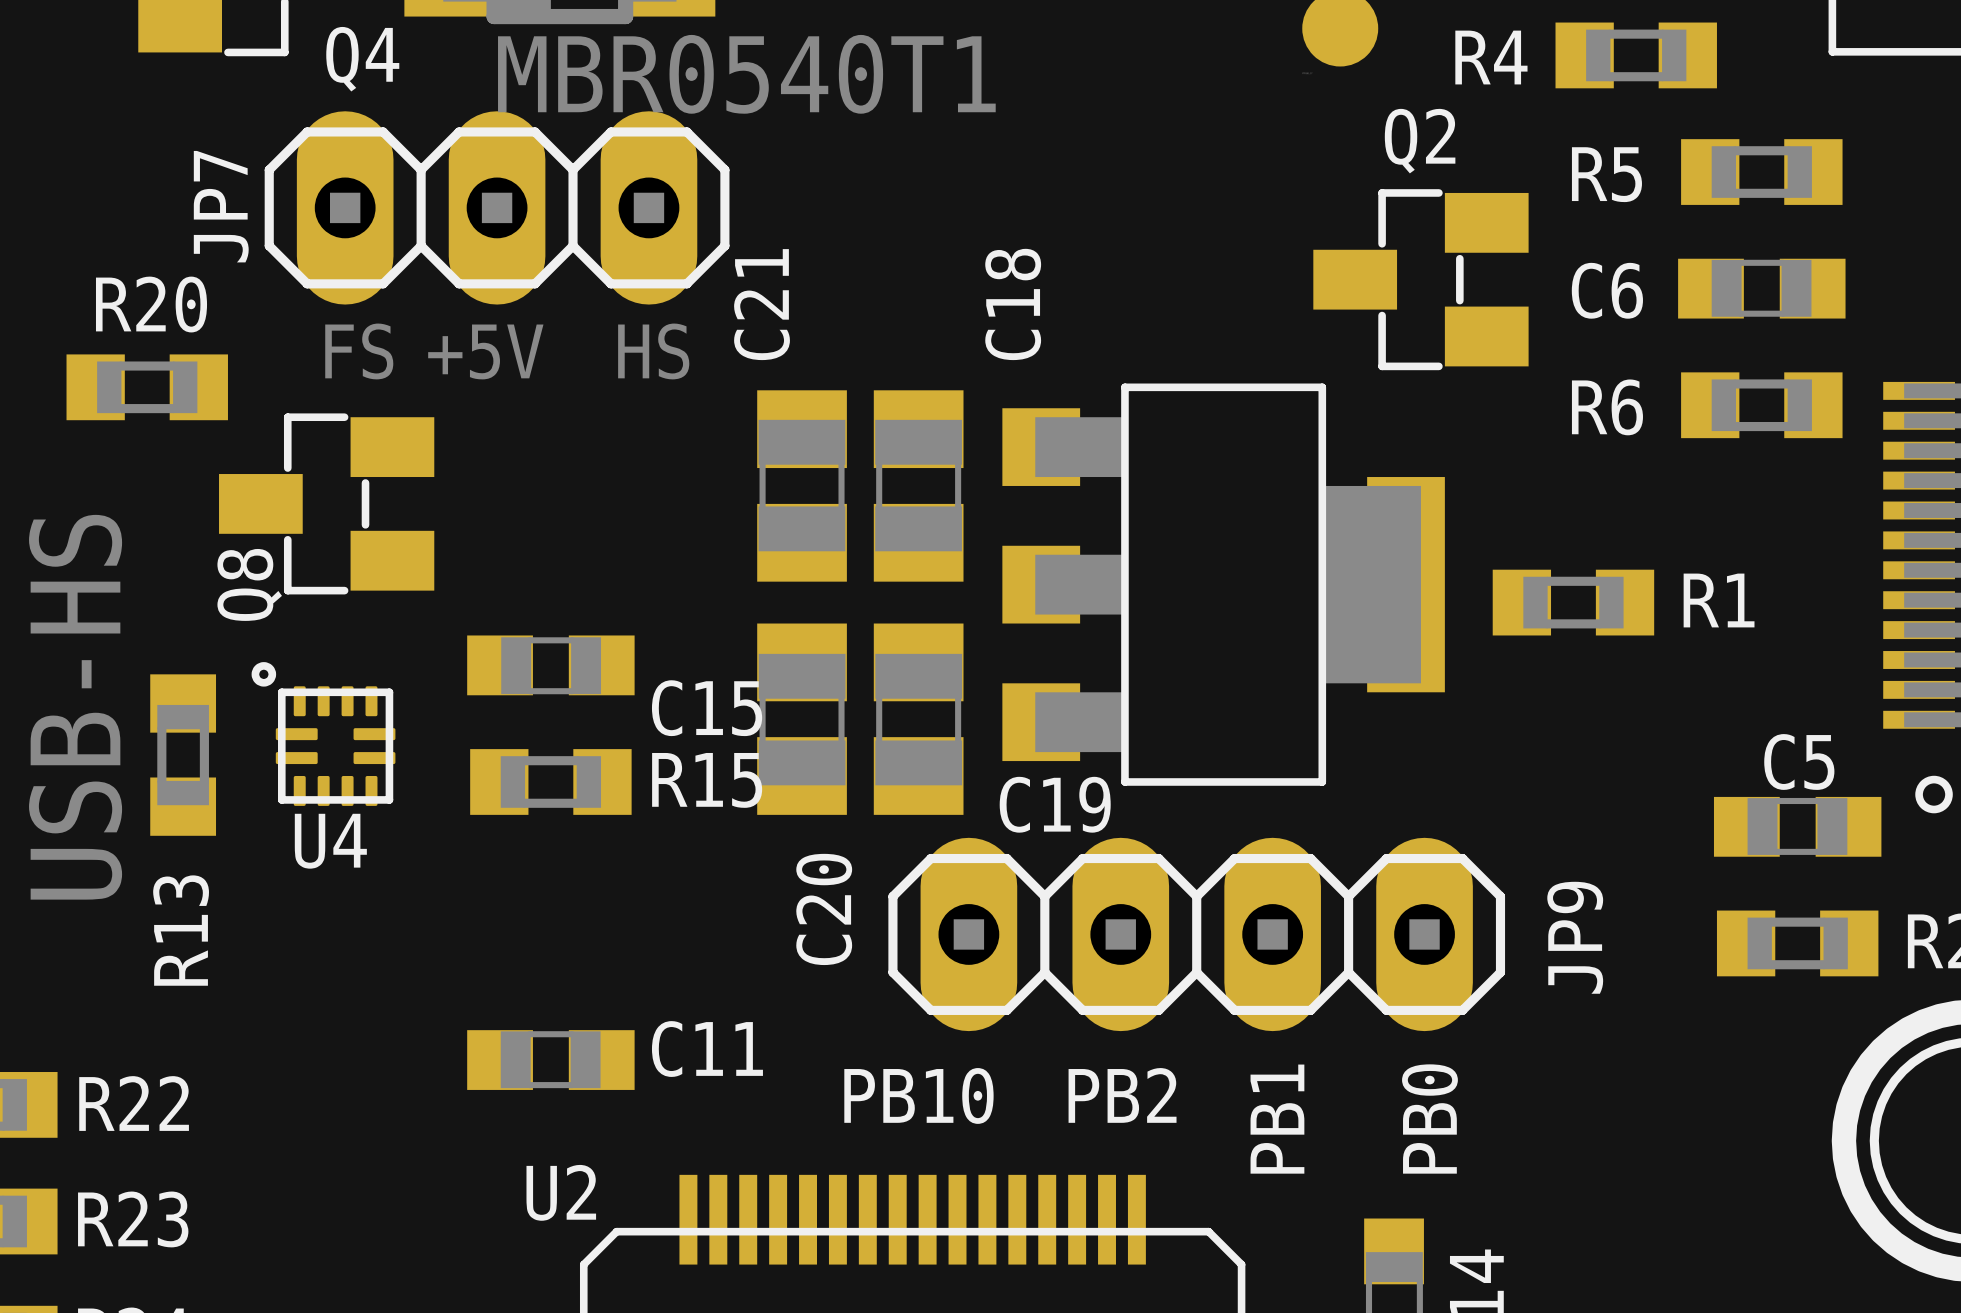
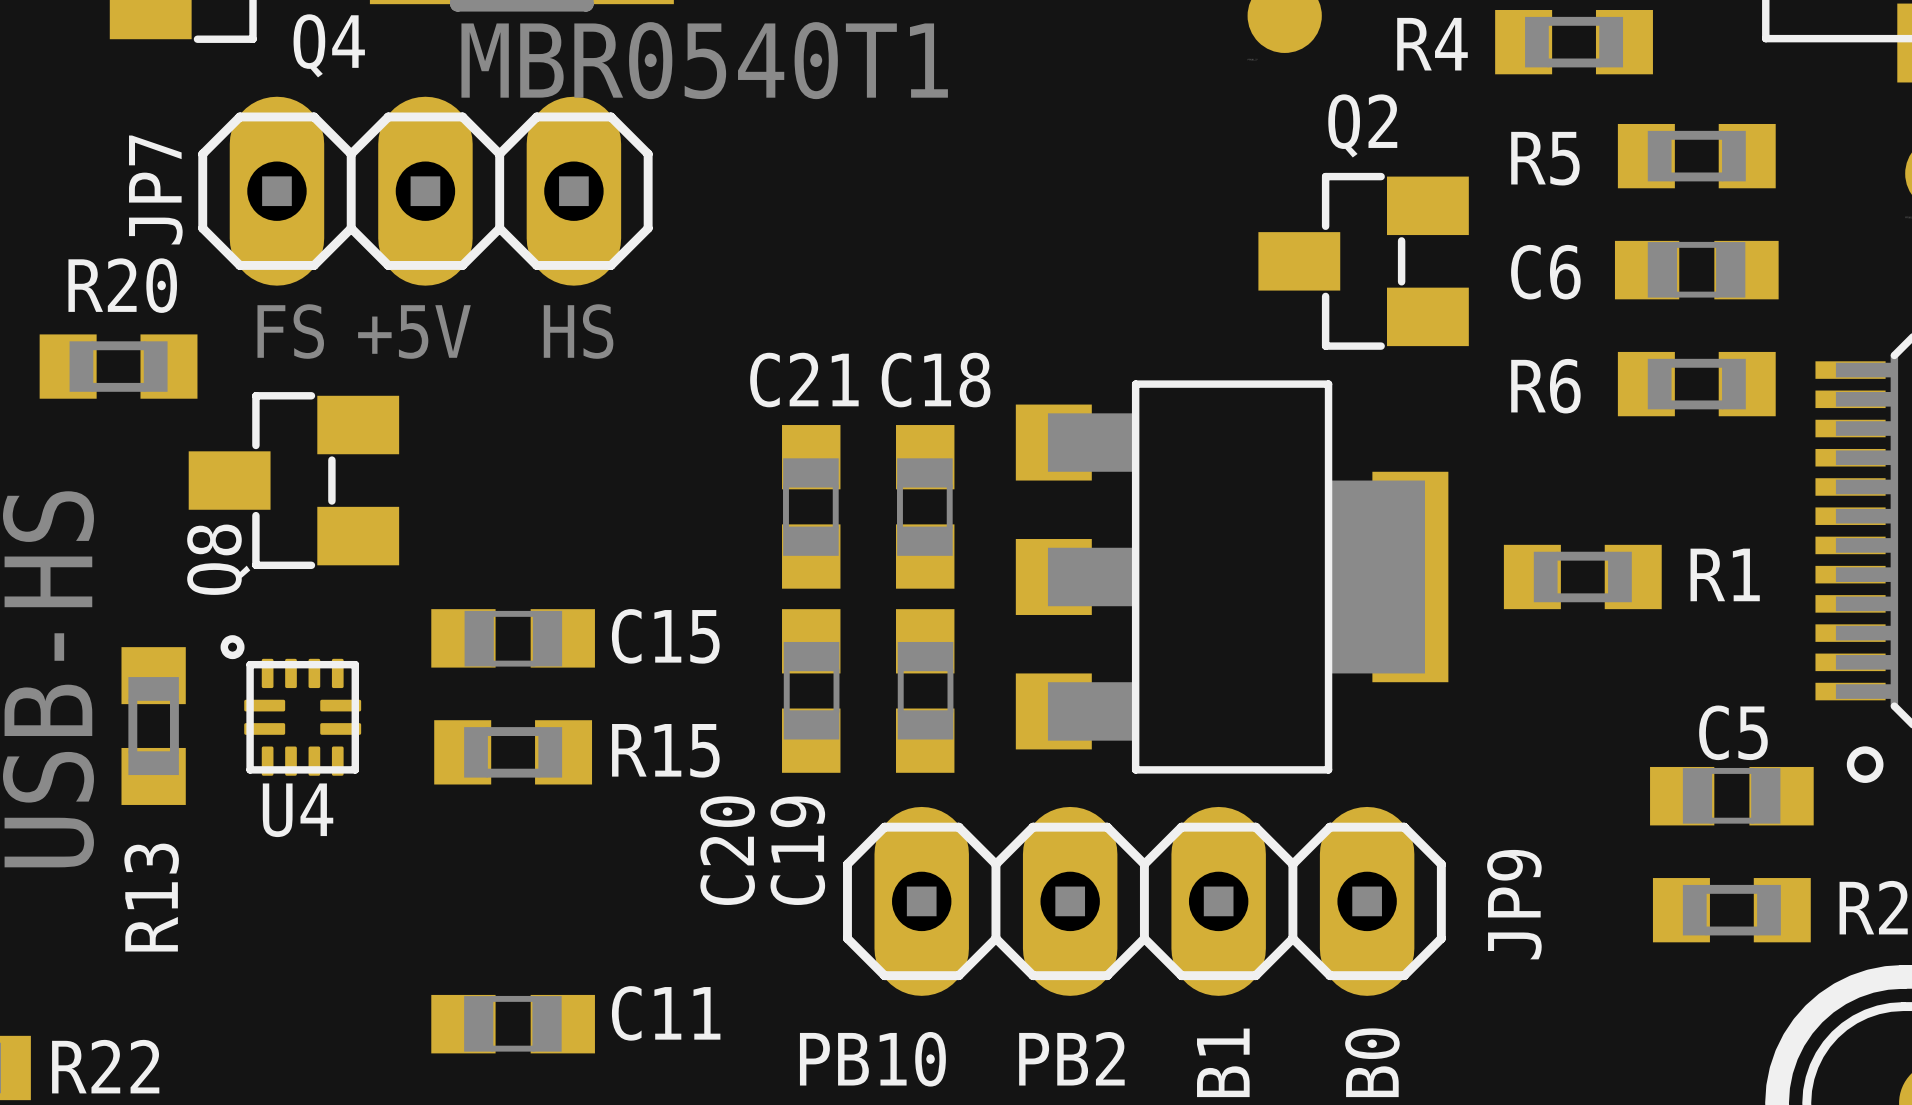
JP7 position: (497, 207) -> (425, 191)
text position: FS (359, 351) -> FS (290, 331)
text position: +5V (485, 351) -> +5V (414, 332)
text position: HS (653, 351) -> HS (578, 331)
C21 footprint: [757, 390, 847, 582] -> [782, 425, 841, 589]
C18 footprint: [873, 390, 964, 582] -> [895, 425, 955, 589]
part position: (1223, 584) -> (1232, 576)
R1 position: (1573, 602) -> (1582, 576)
C20 footprint: [757, 623, 847, 815] -> [782, 609, 841, 773]
C19 footprint: [873, 623, 964, 815] -> [895, 609, 955, 773]
C15 name position: C15 (707, 708) -> C15 (665, 636)
C19 name position: C19 (1055, 804) -> C19 (797, 850)

